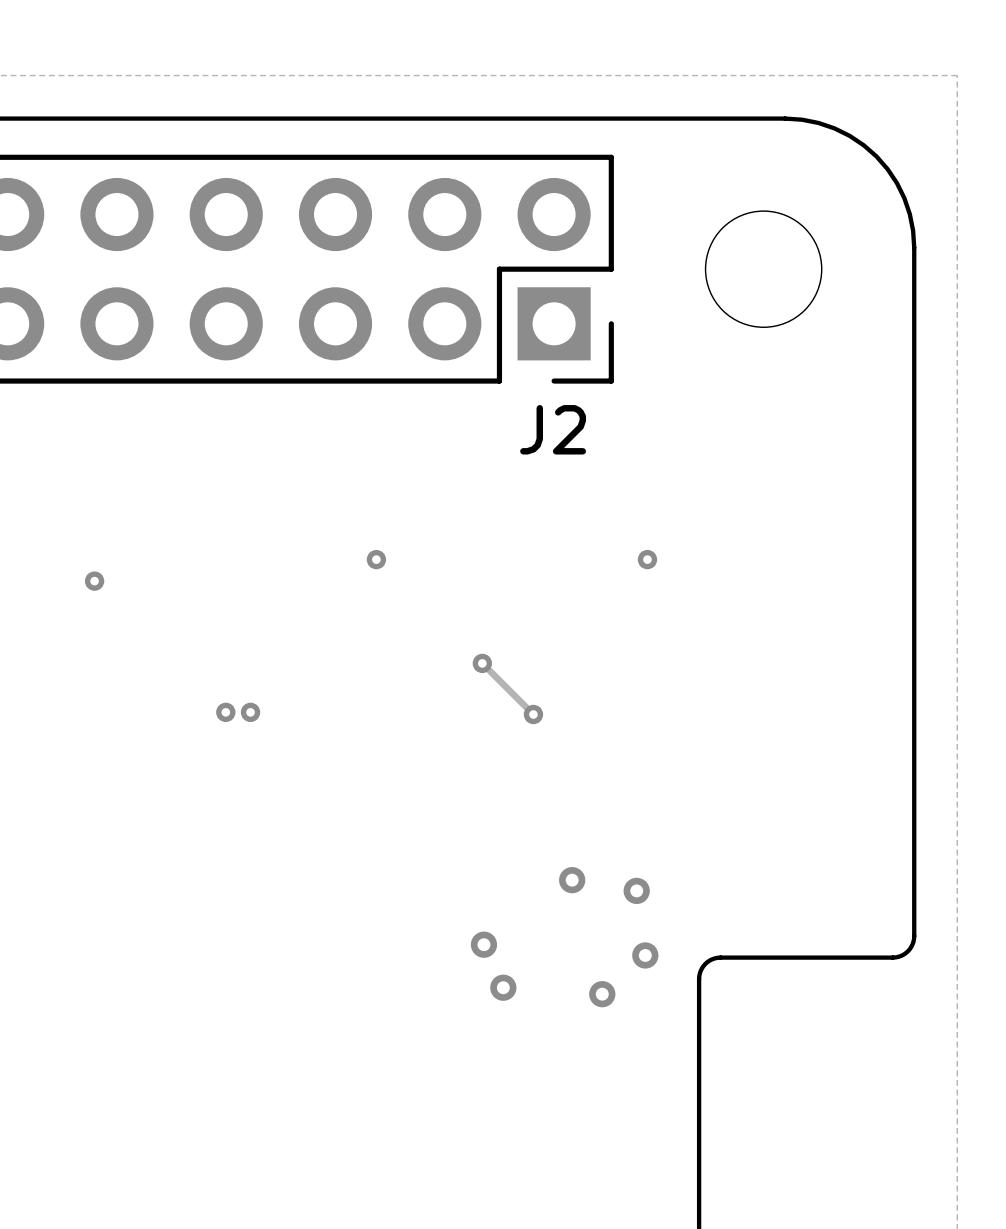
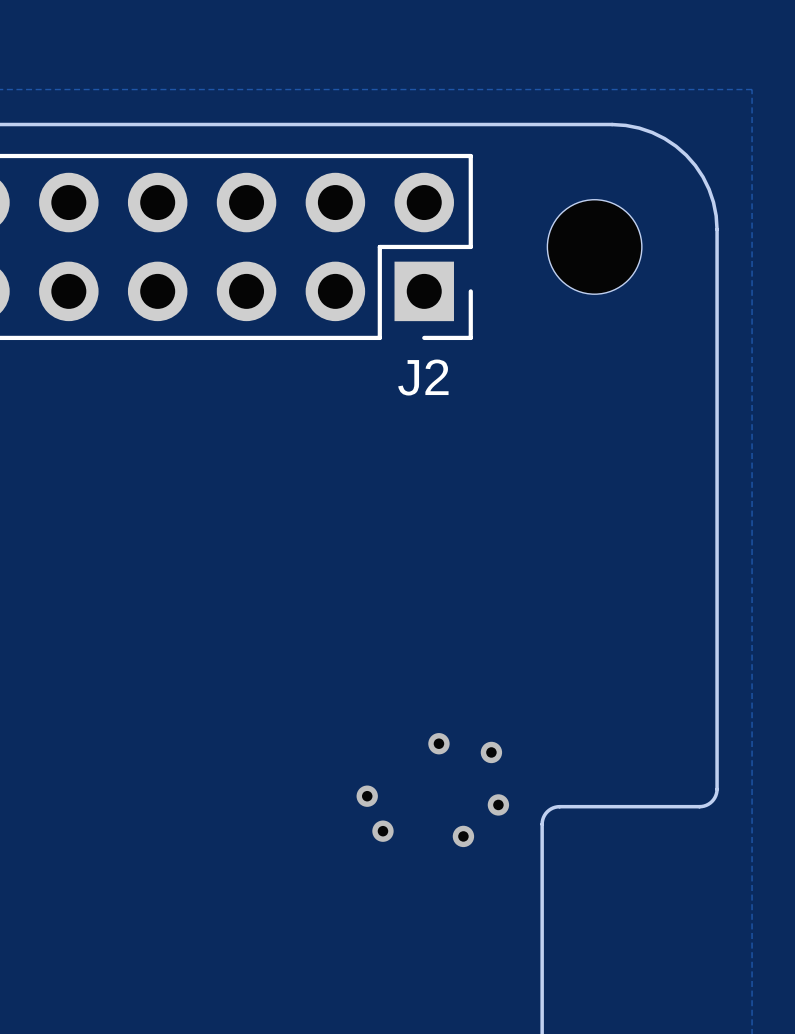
via: (376, 559) -> none
via: (647, 559) -> none
via: (94, 581) -> none
track: (482, 663) (533, 714) -> none
via: (482, 663) -> none
via: (225, 712) -> none
via: (250, 712) -> none
via: (533, 714) -> none

